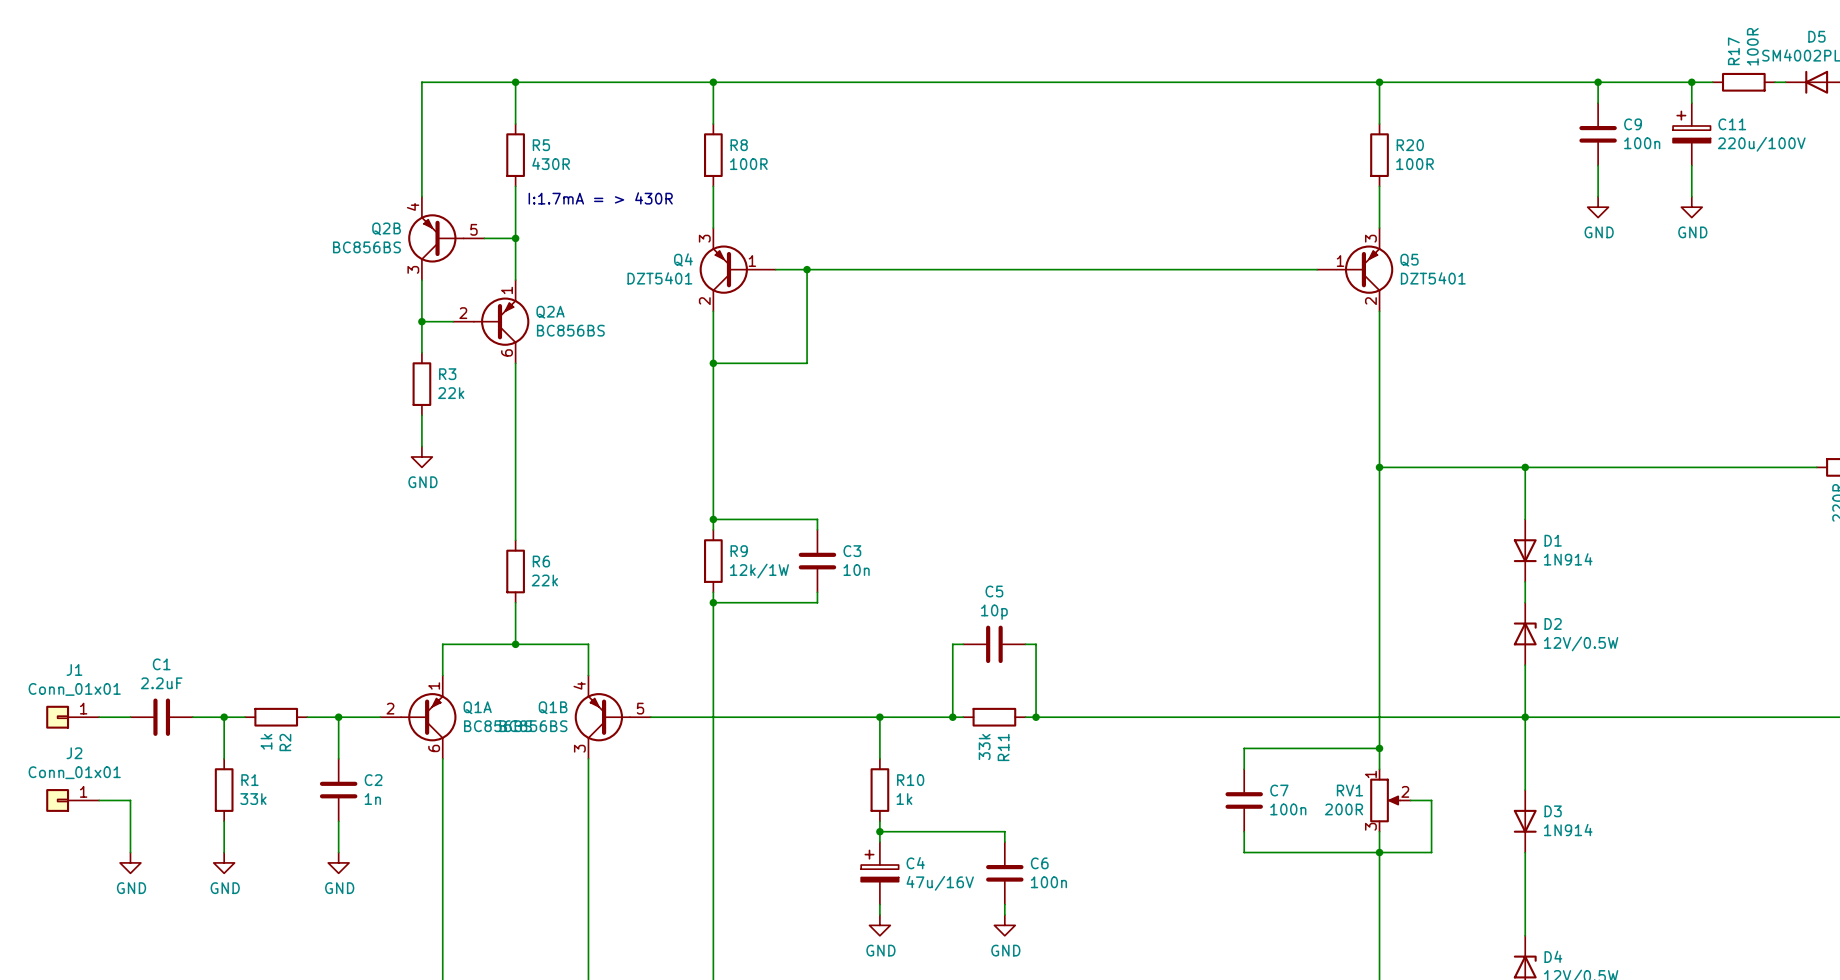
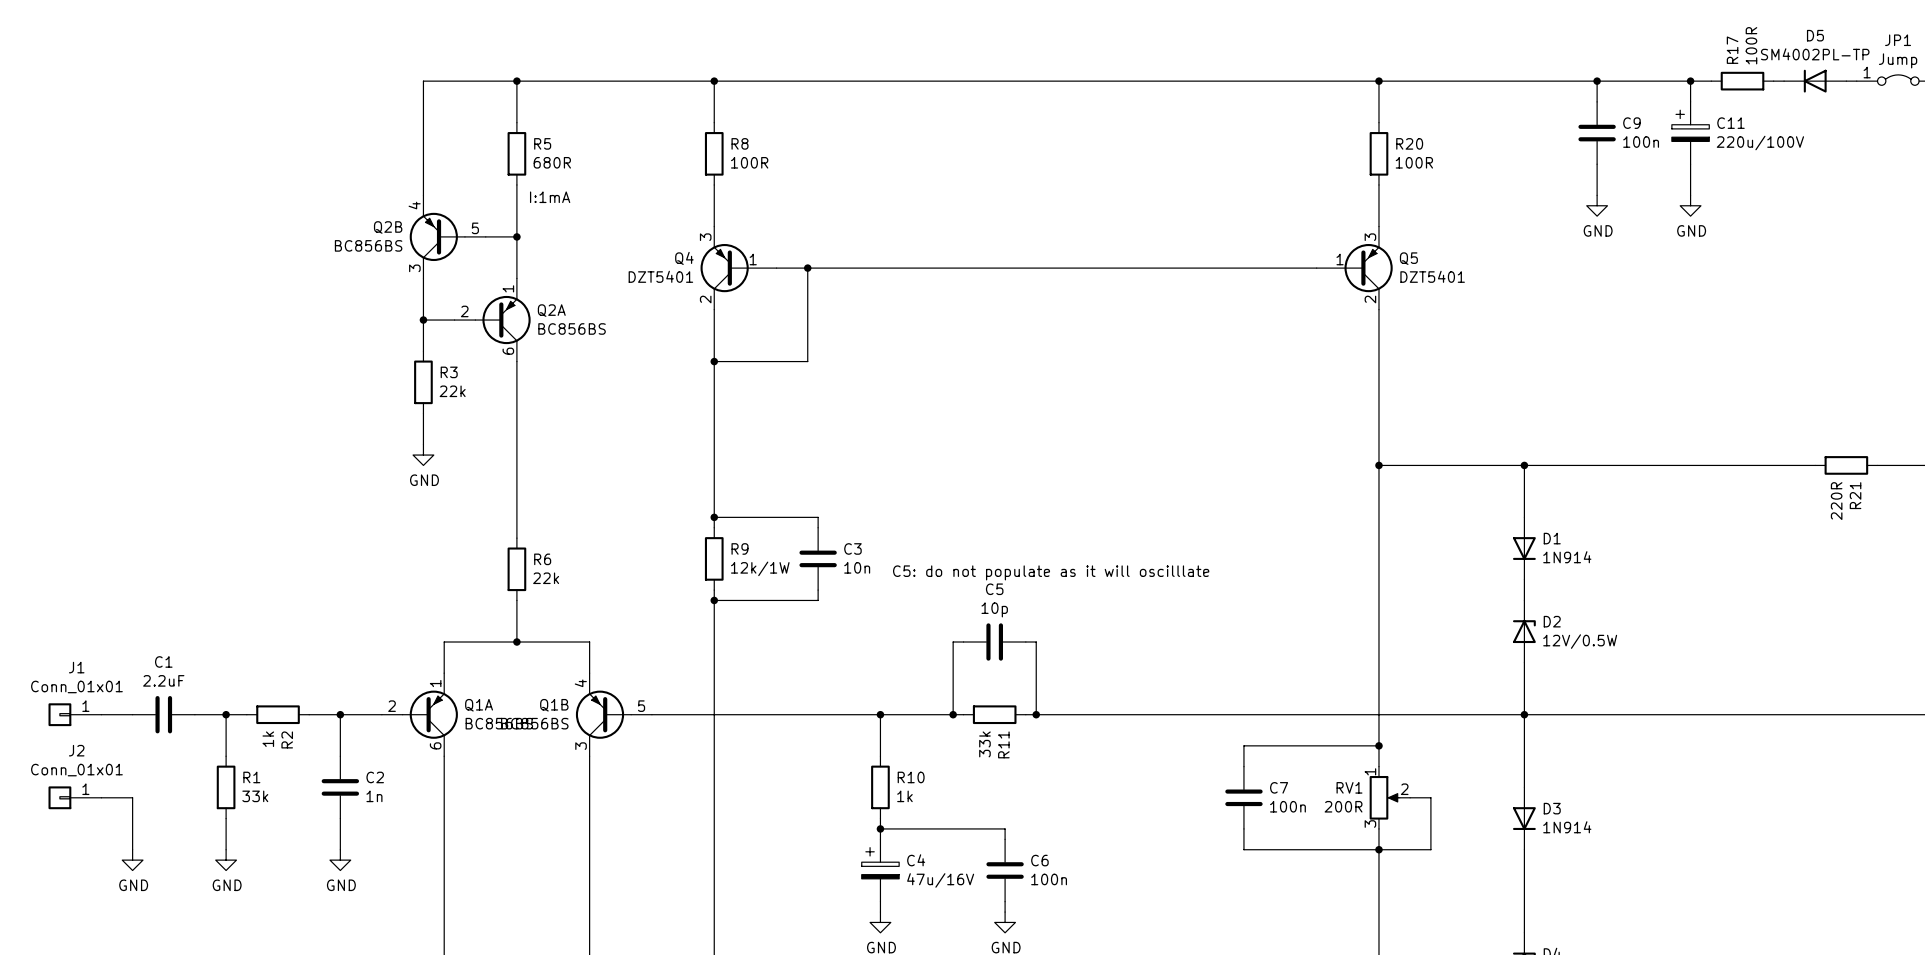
R5 value: 430R (551, 163) -> 680R (552, 162)
text: I:1.7mA = > 430R (600, 198) -> I:1mA (550, 197)
text: none -> C5: do not populate as it will oscilllate (1051, 572)

